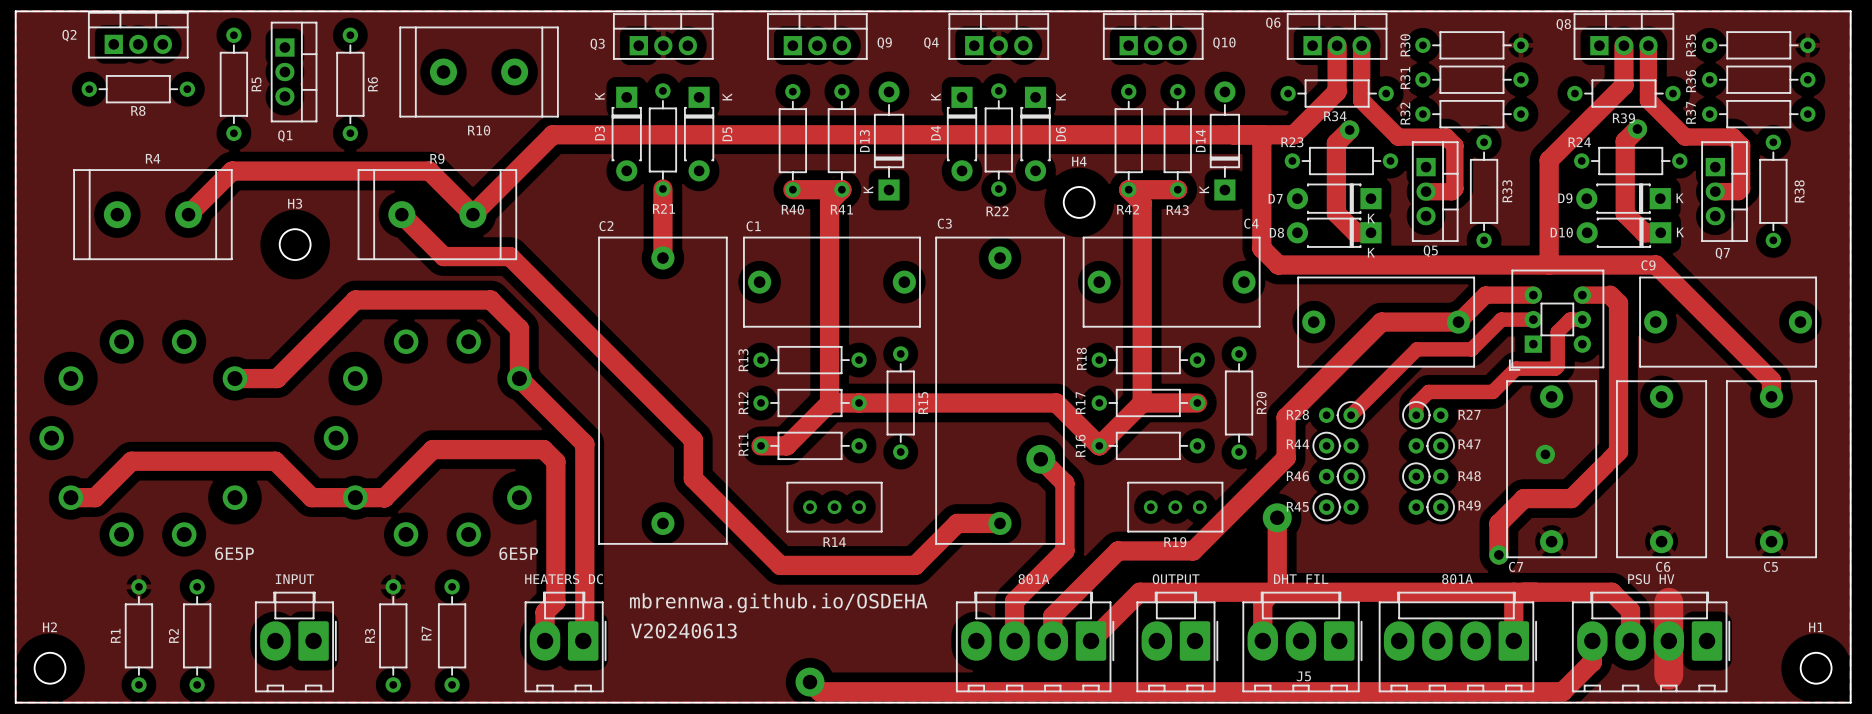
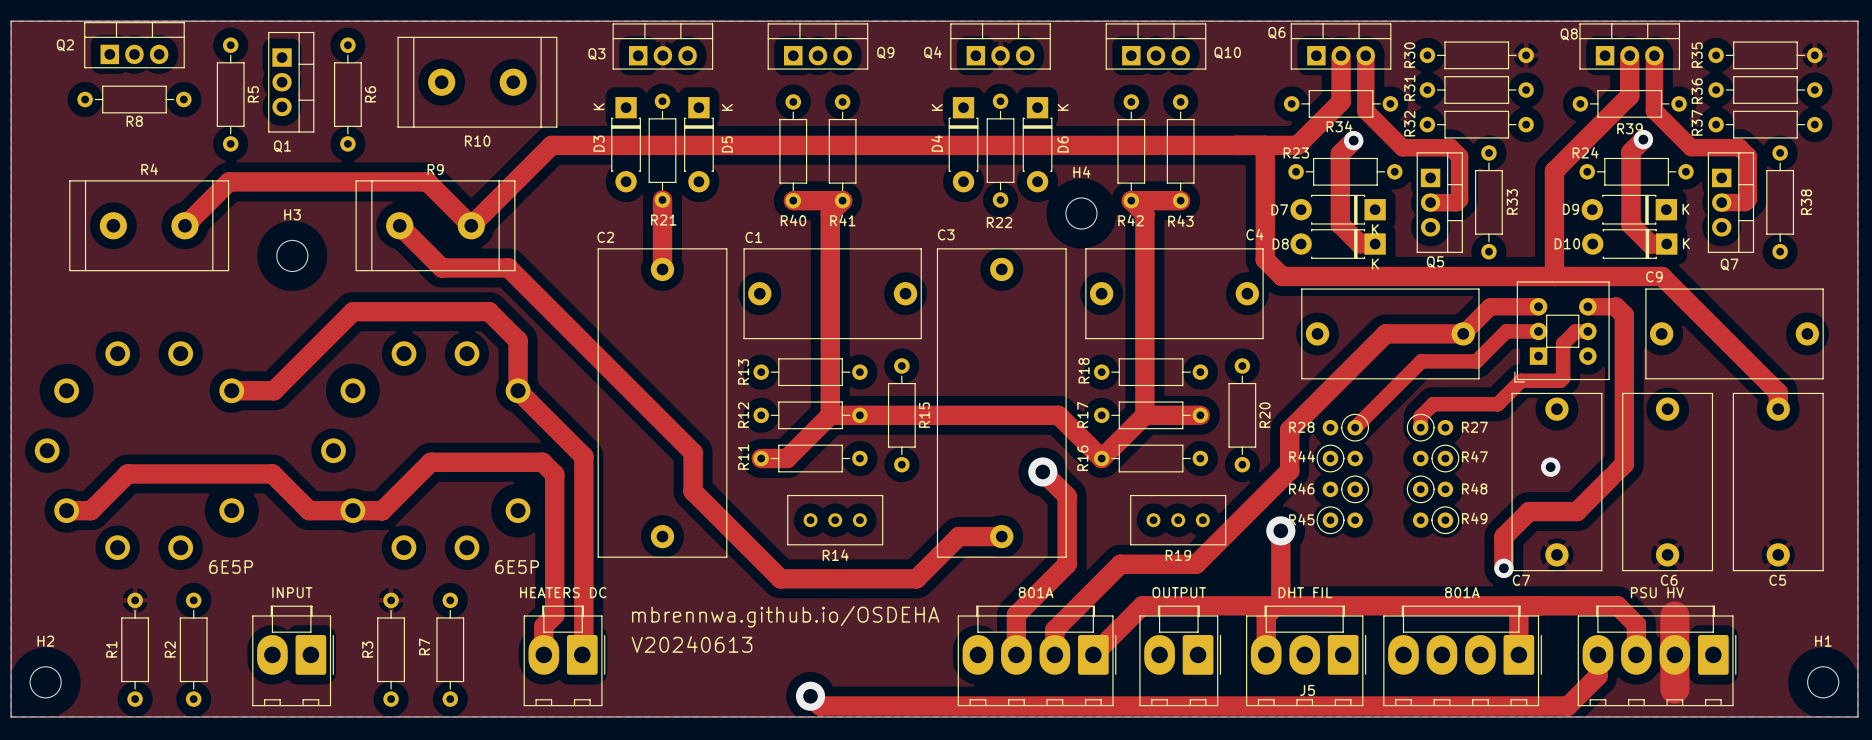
D13: (889, 140) -> none
D14: (1224, 140) -> none

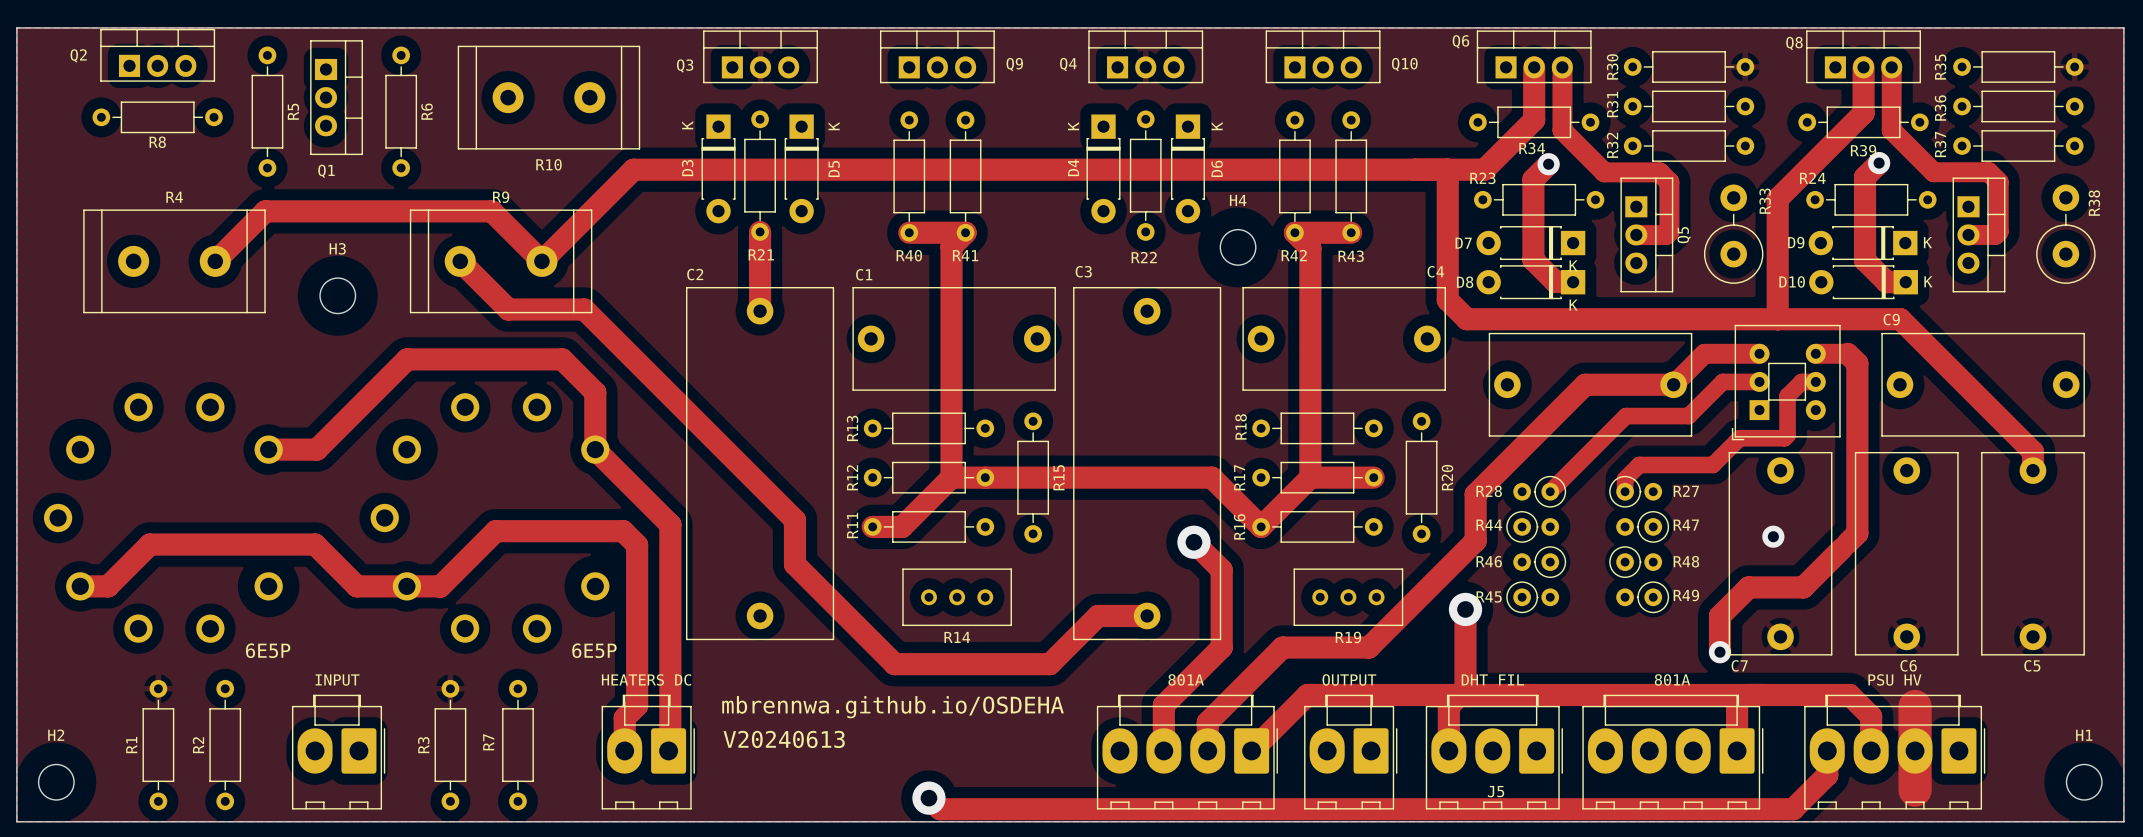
R33 footprint: [1475, 145, 1503, 260] -> [1703, 184, 1764, 284]
R38 footprint: [1766, 145, 1795, 260] -> [2036, 184, 2096, 284]
R33 name position: R33 (1512, 201) -> R33 (1765, 201)
R38 name position: R38 (1806, 202) -> R38 (2094, 203)
Q5 name rotation: 0° (1435, 262) -> 90° counterclockwise (1684, 235)
Q5 name position: Q5 (1435, 262) -> Q5 (1684, 235)
Q7 name: Q7 (1729, 264) -> none

